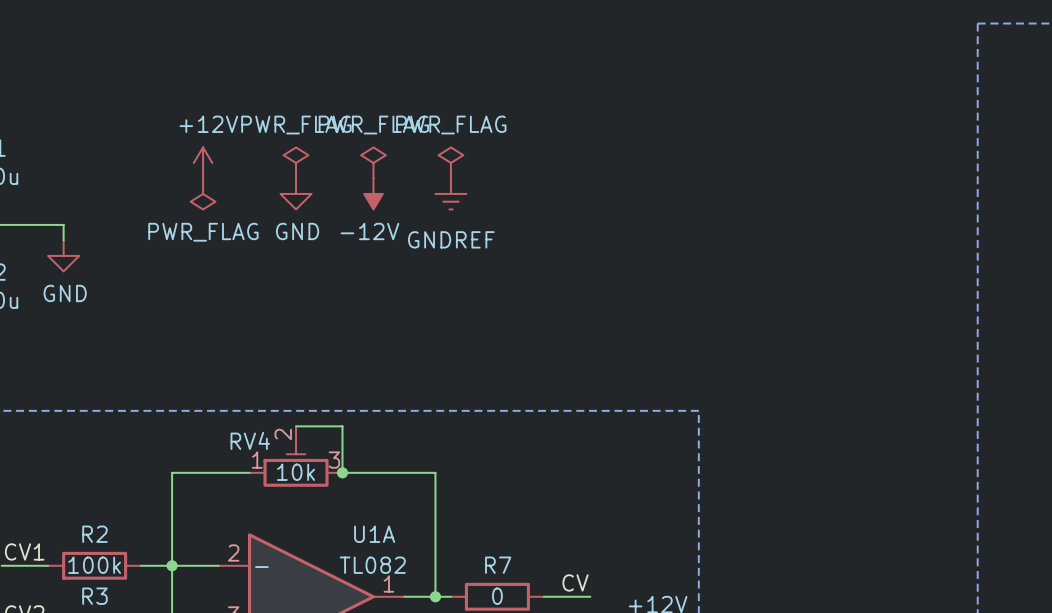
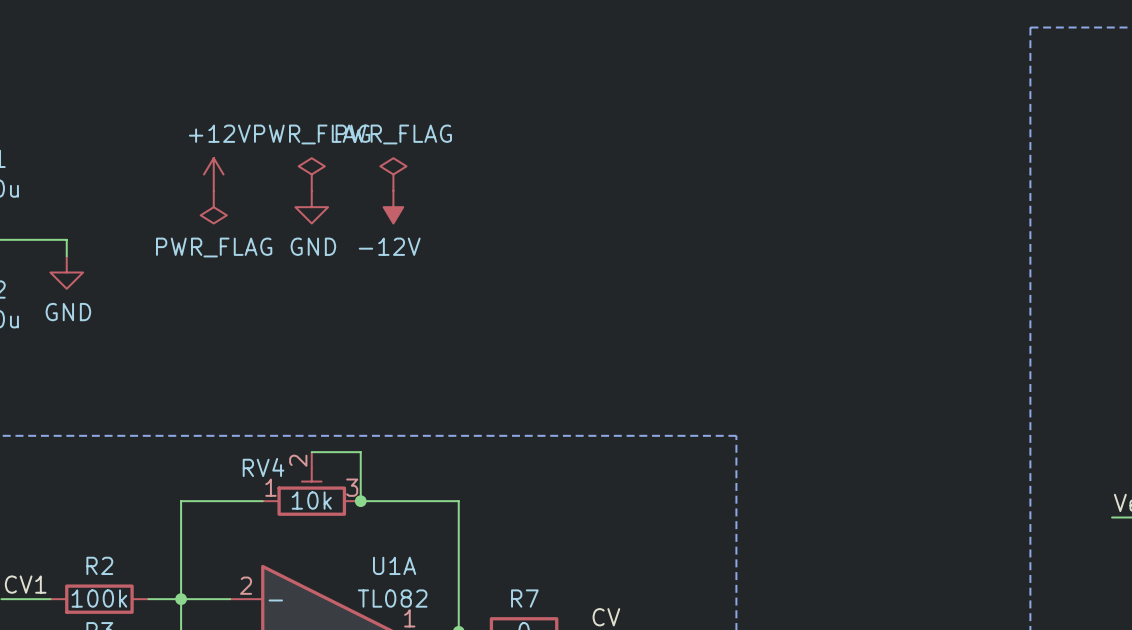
power symbol: PWR_FLAG (450, 162) -> none
power symbol: GNDREF (450, 193) -> none

